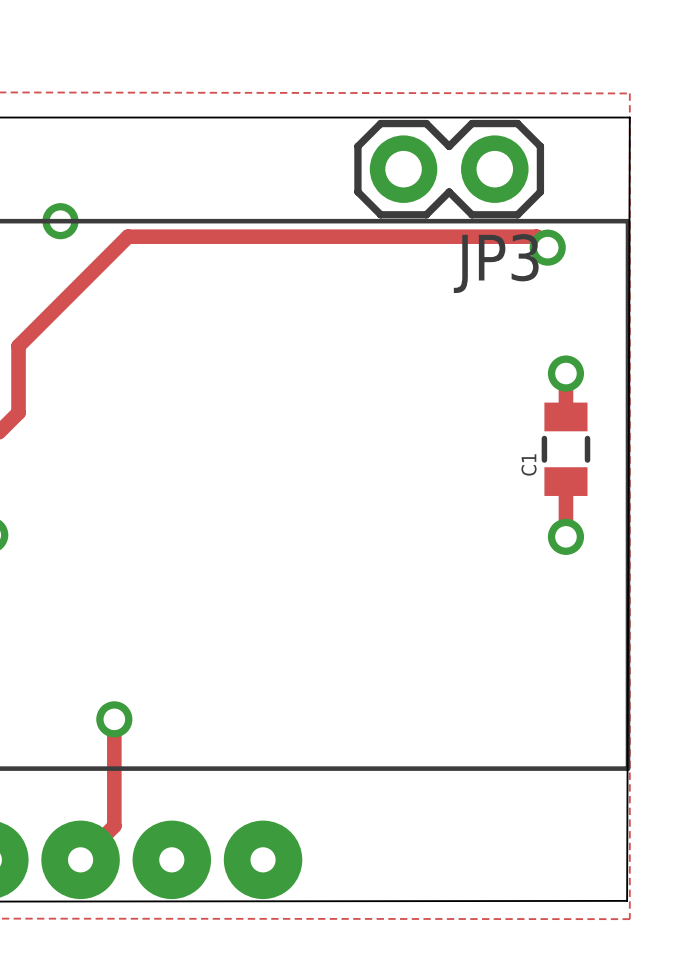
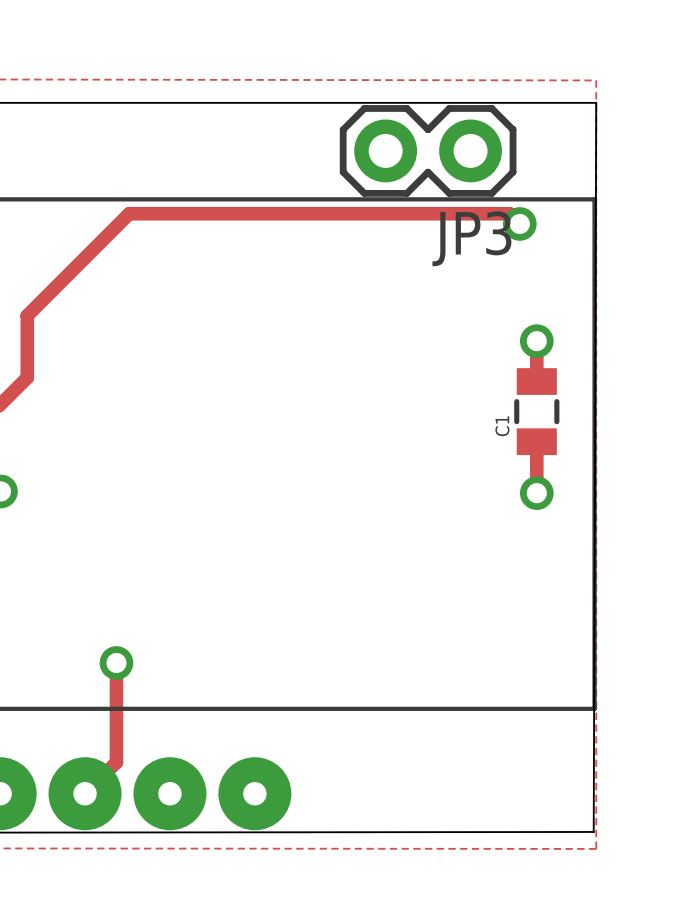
via: (60, 221) -> none

